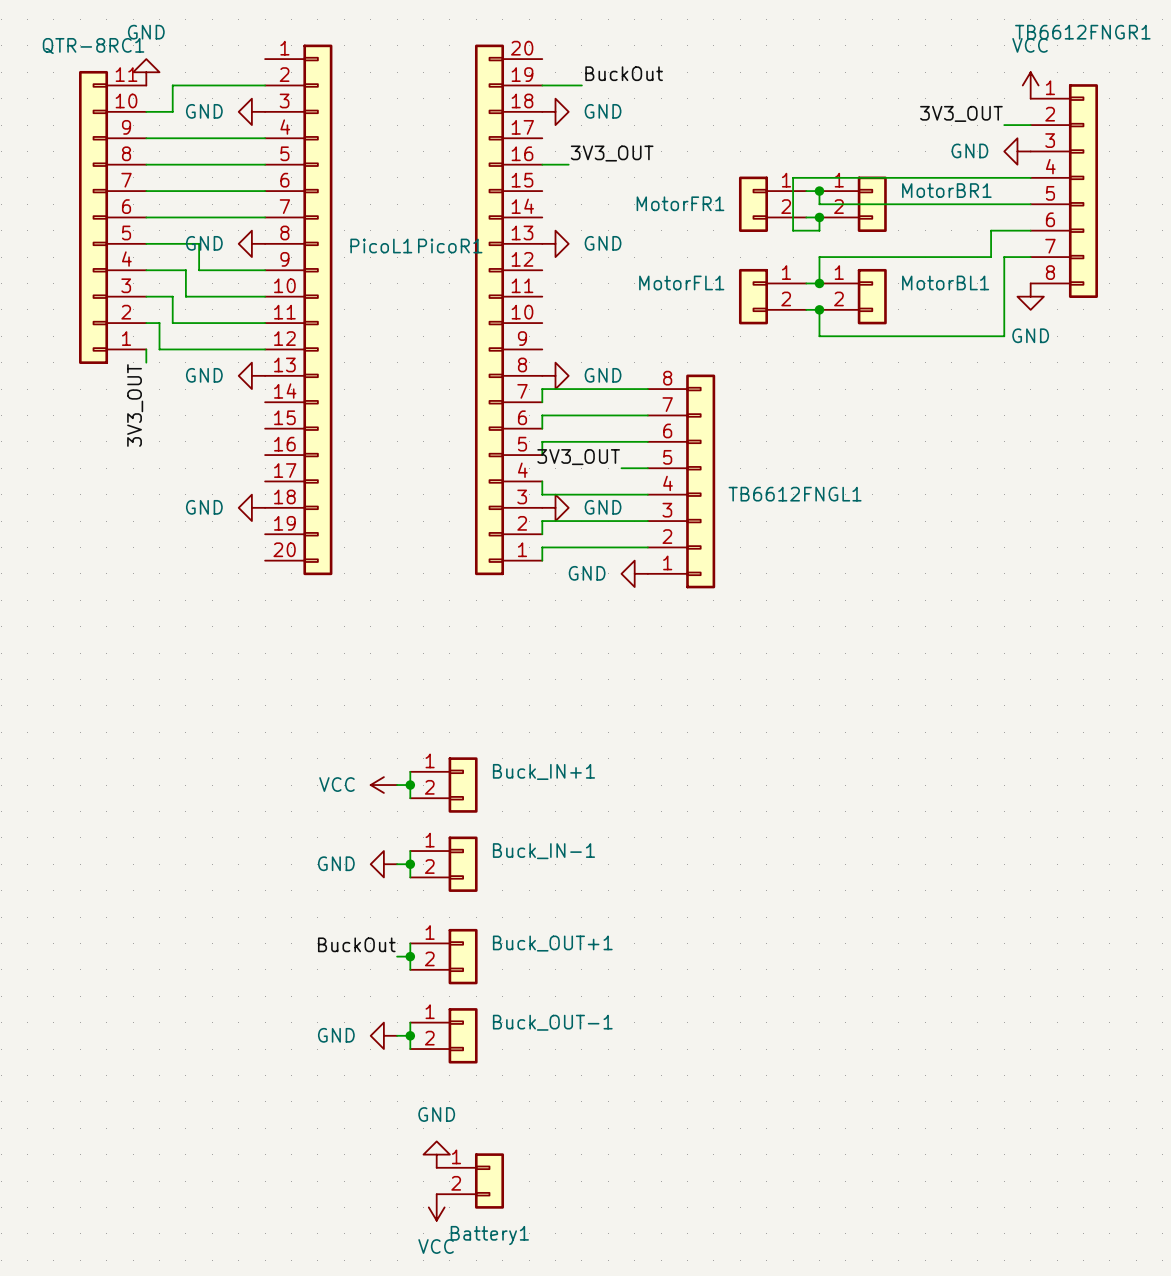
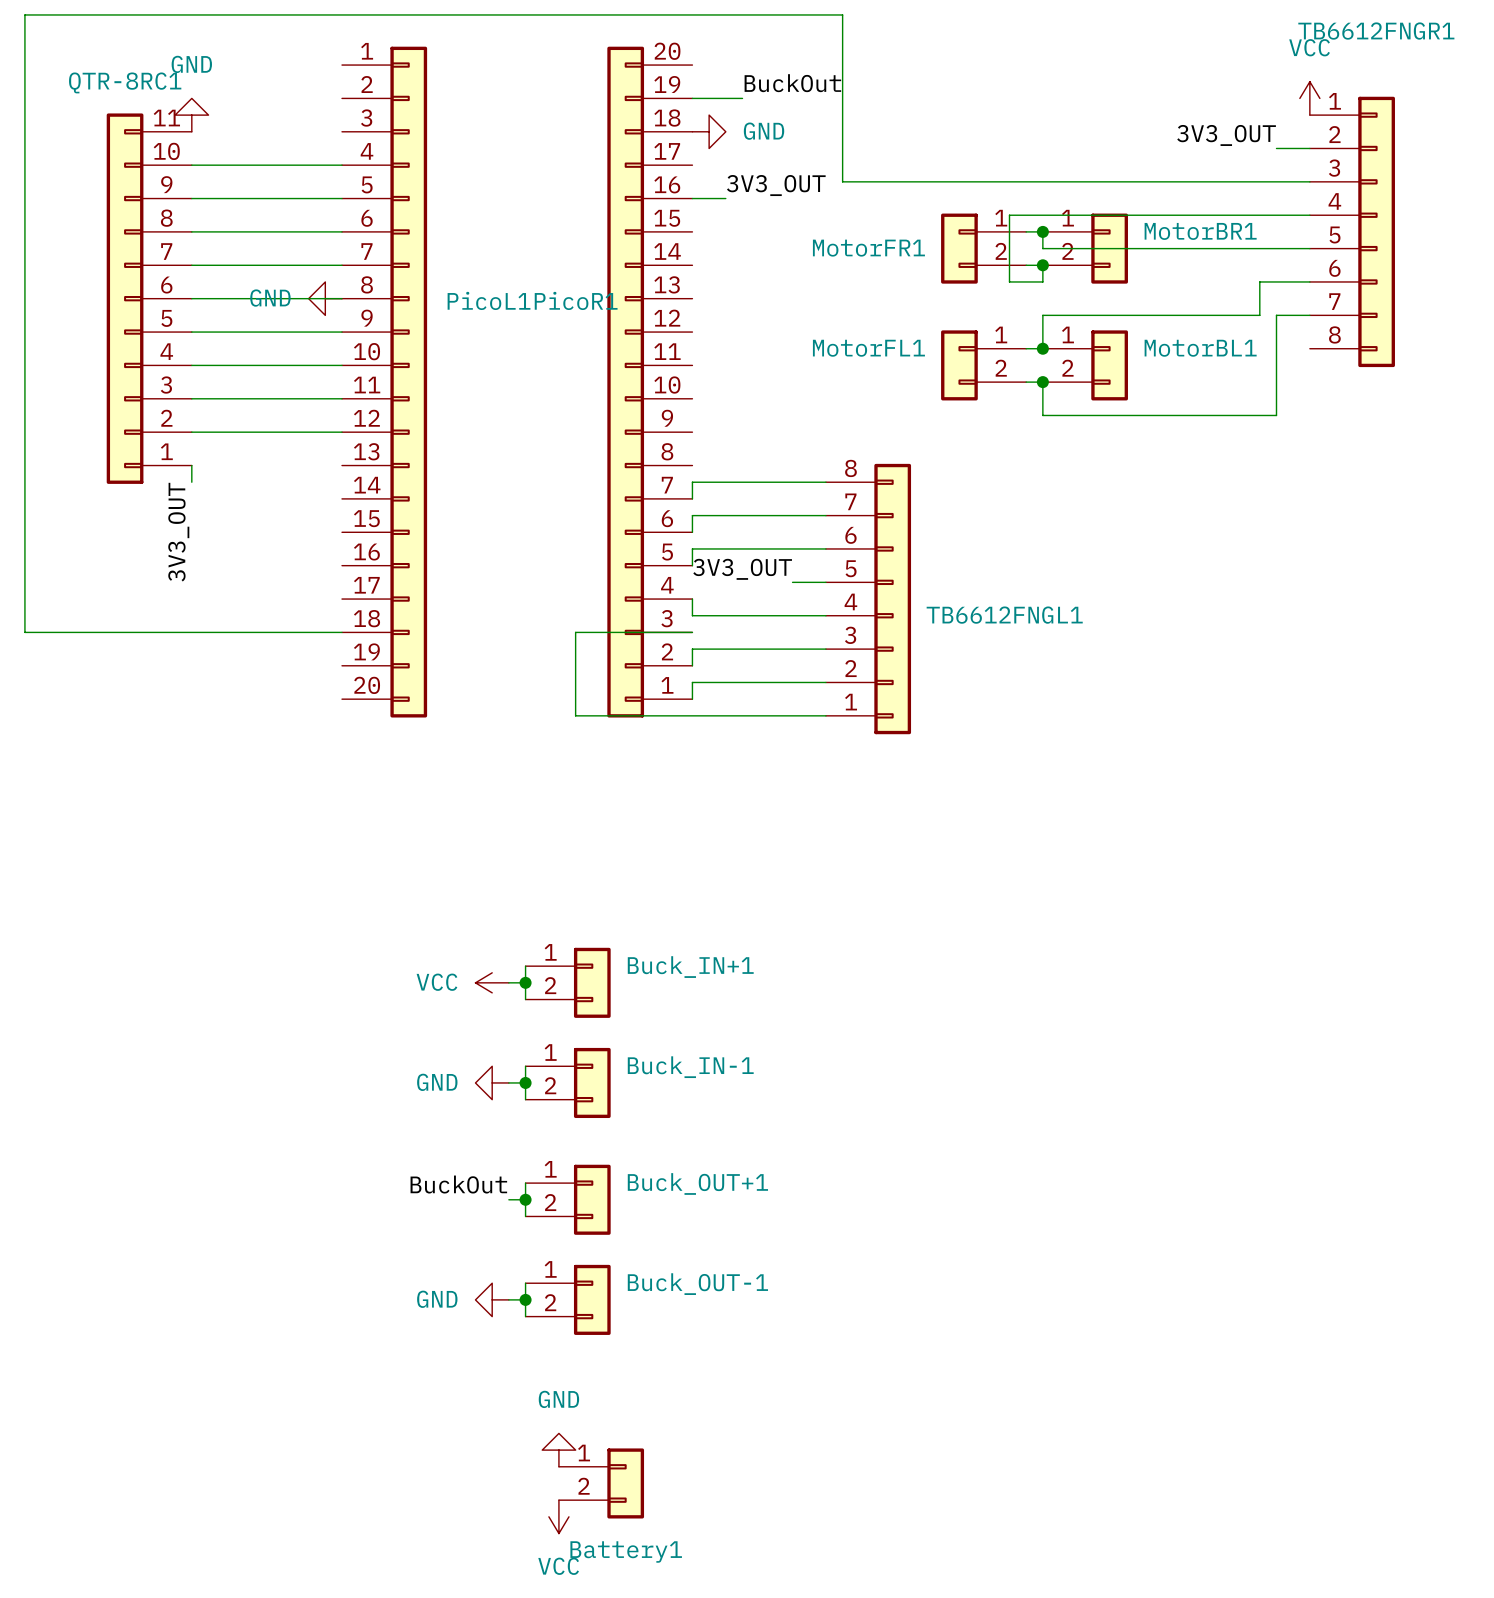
power symbol position: GND (146, 72) -> GND (191, 115)
wire: (265, 85) (172, 85) (172, 111) (146, 111) -> none
power symbol: GND (251, 111) -> none
power symbol: GND (1017, 151) -> none
wire: none -> (1309, 181) (842, 181) (842, 14) (24, 14) (24, 632) (342, 632)
QTR-8RC1 position: (112, 217) -> (149, 298)
wire: (199, 243) (199, 270) -> (241, 332) (258, 332)
wire: none -> (258, 298) (342, 298)
power symbol: GND (555, 243) -> none
wire: (185, 270) (185, 296) -> (225, 365) (241, 365)
wire: (172, 296) (172, 323) -> none
power symbol: GND (1030, 296) -> none
wire: (159, 323) (159, 349) -> (208, 398) (225, 398)
wire: (146, 349) (146, 362) -> (191, 432) (208, 432)
wire: none -> (191, 465) (191, 482)
power symbol: GND (251, 375) -> none
power symbol: GND (555, 375) -> none
label position: 3V3_OUT (135, 405) -> 3V3_OUT (178, 532)
power symbol: GND (251, 507) -> none
wire: none -> (692, 632) (575, 632) (575, 715) (825, 715)
power symbol: GND (555, 507) -> none
power symbol: GND (634, 573) -> none

